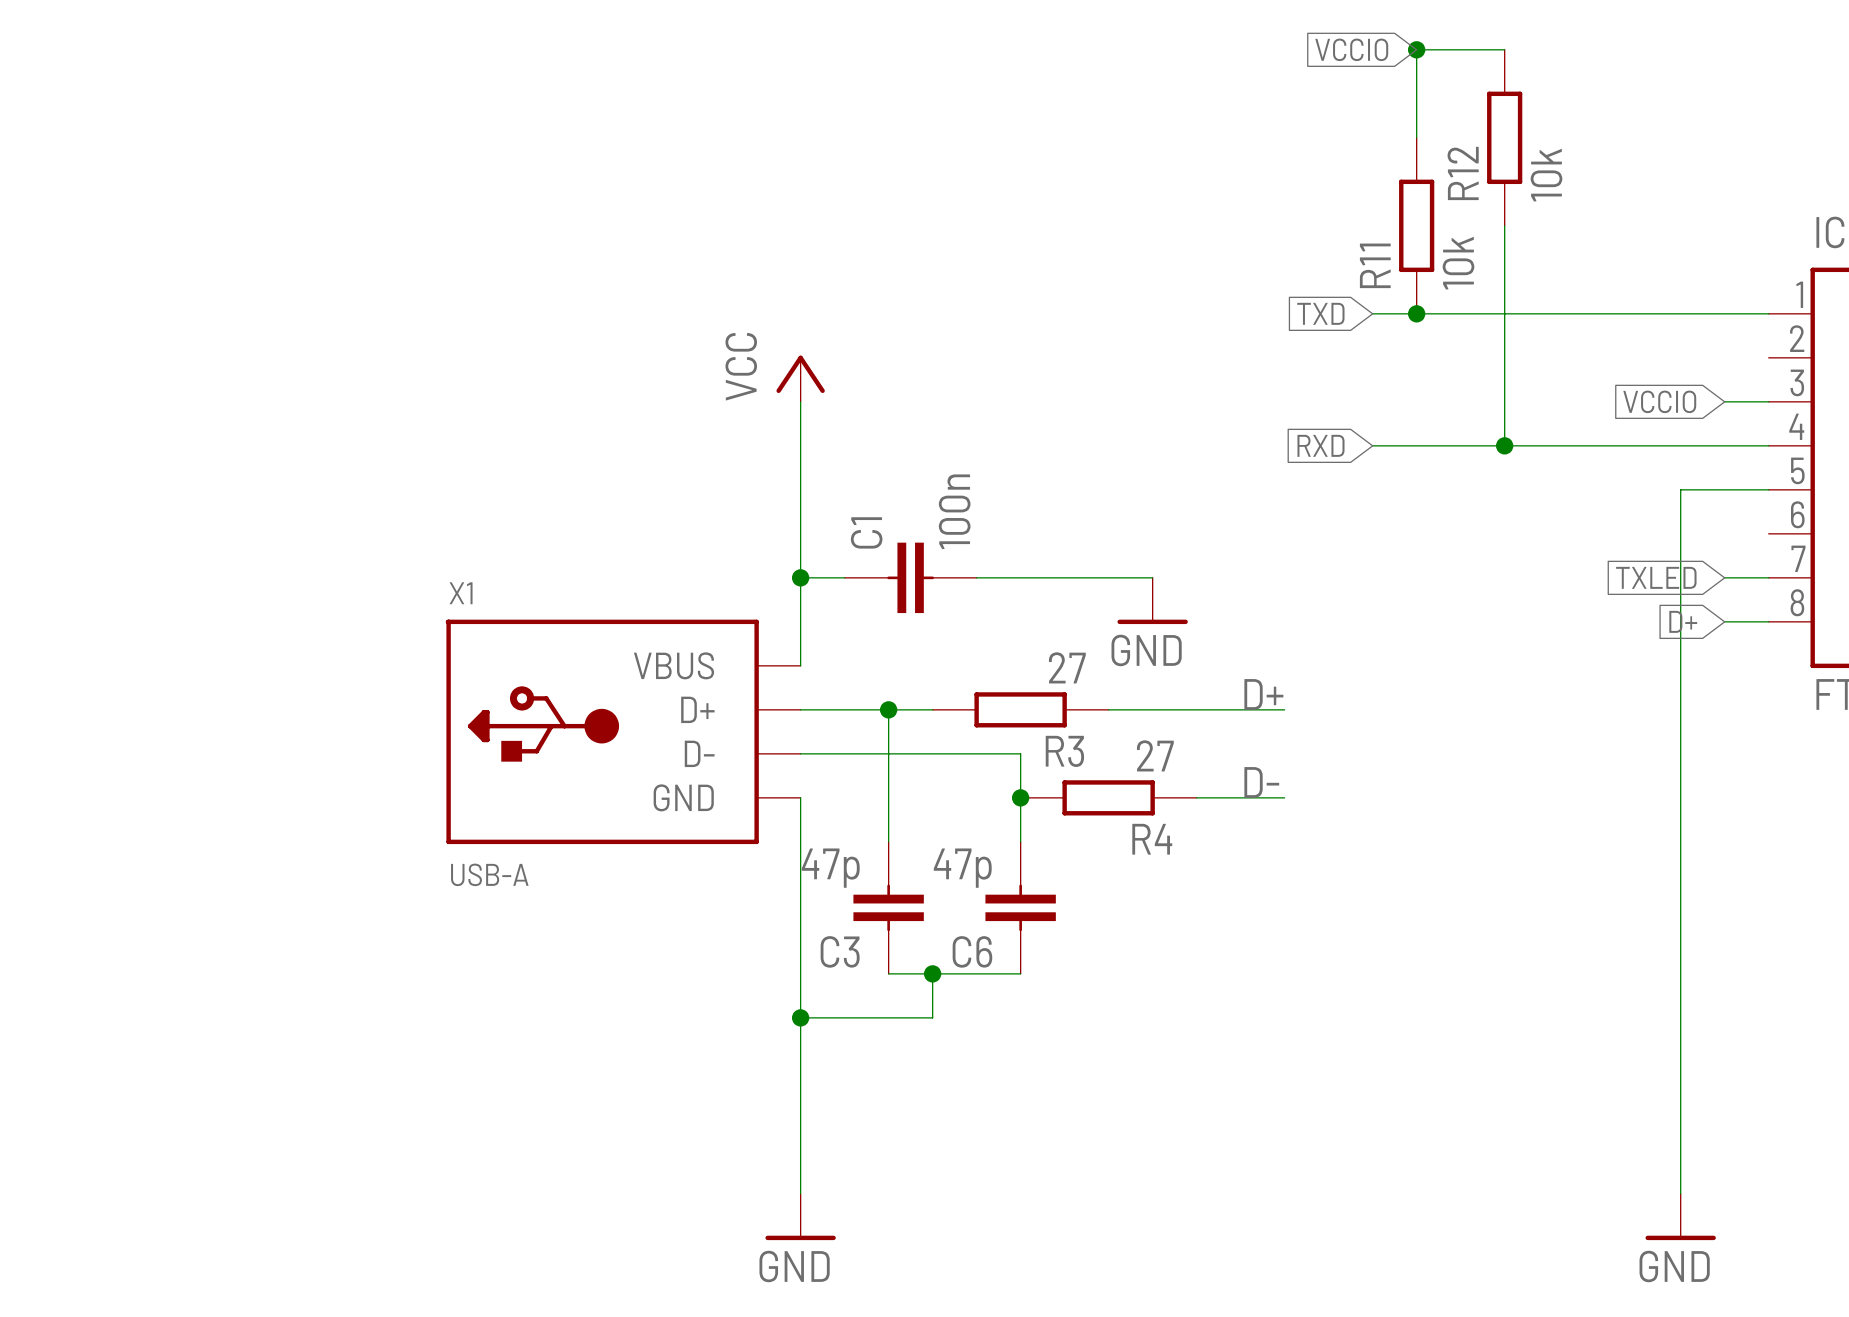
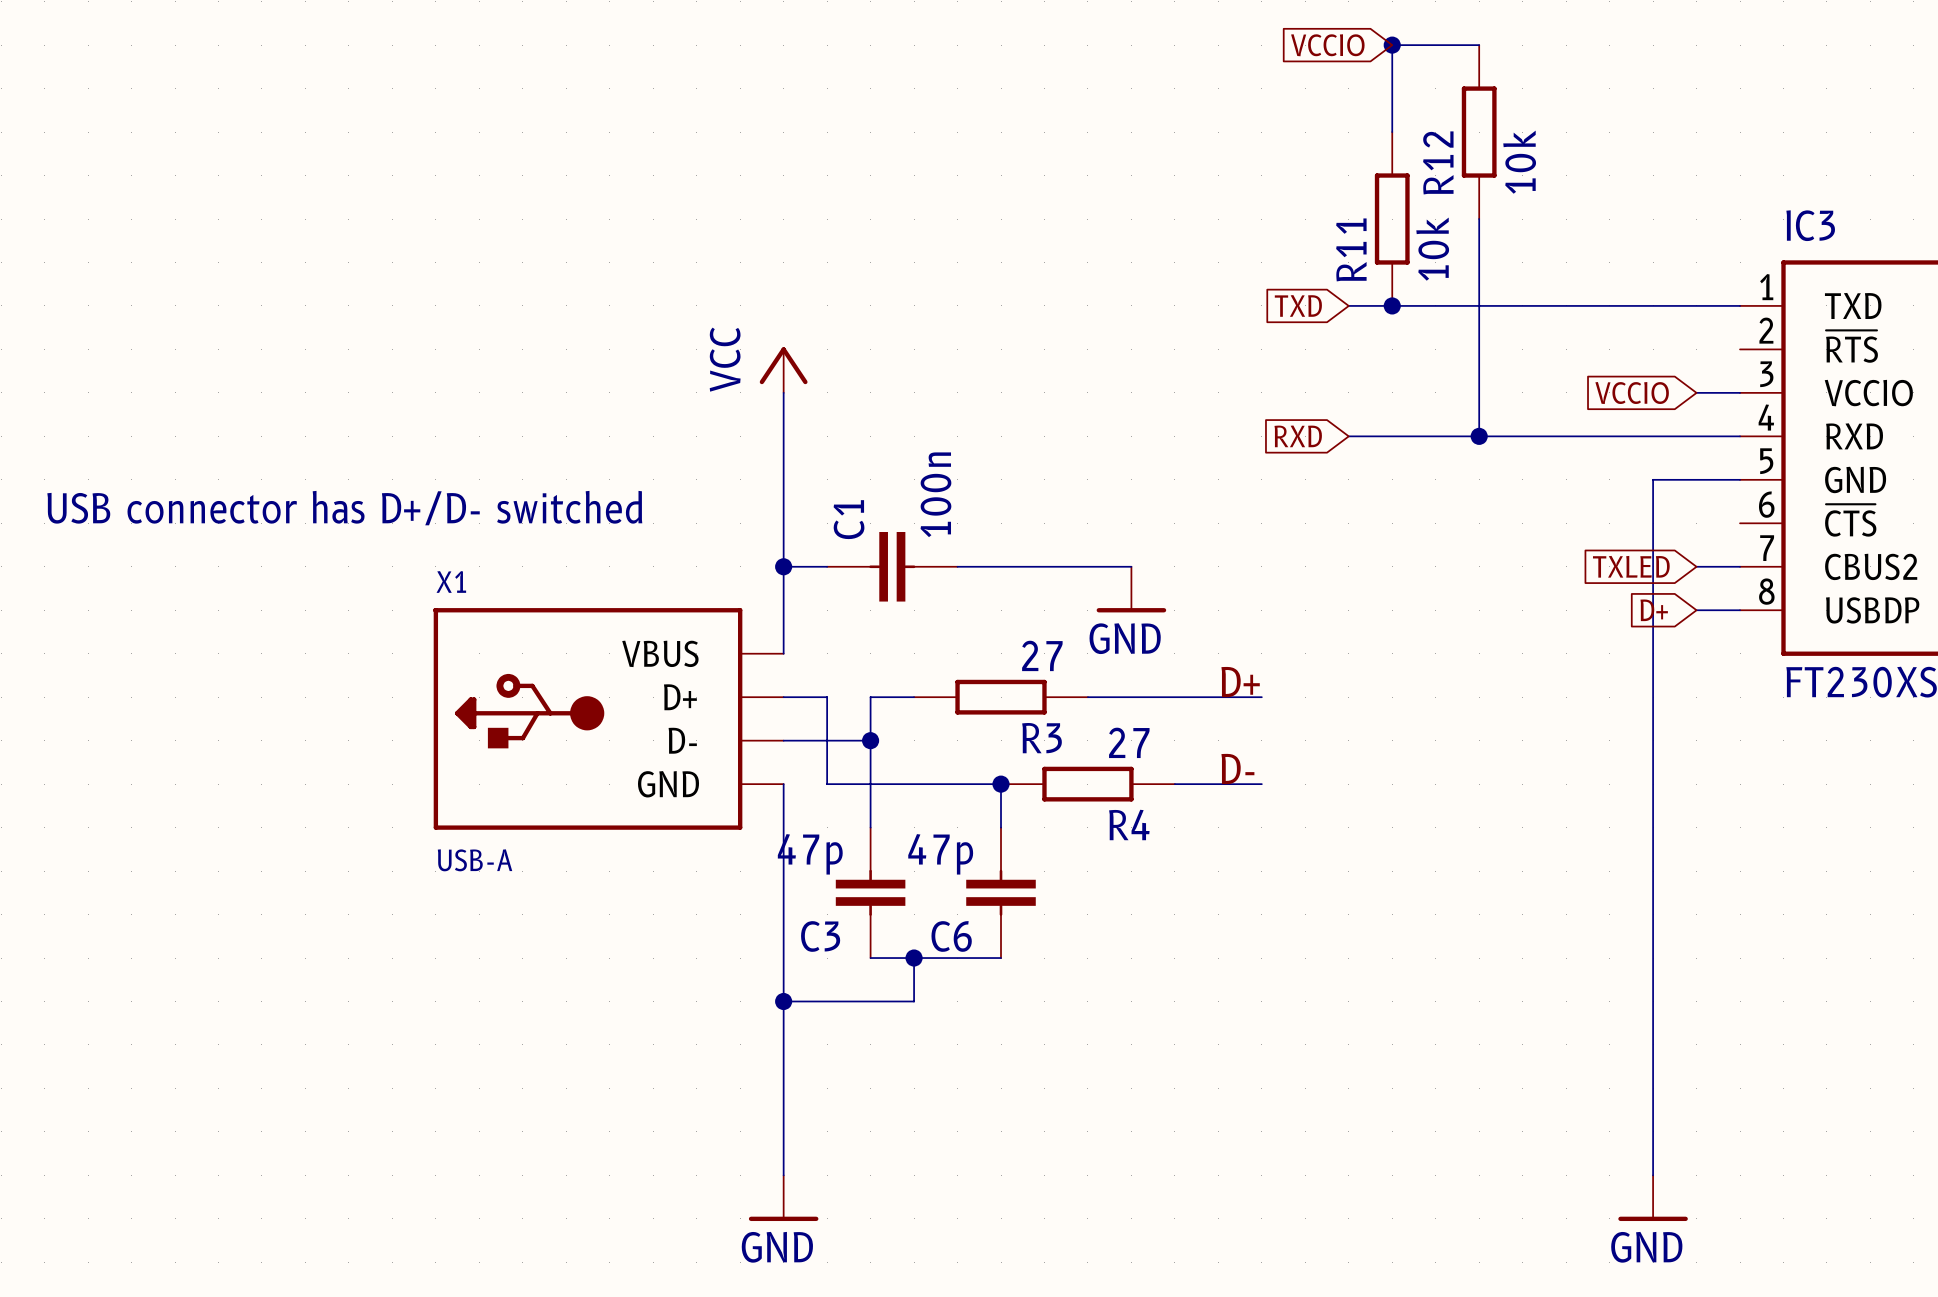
text: none -> USB connector has D+/D- switched (344, 508)
wire: (844, 709) (888, 709) -> none
junction position: (888, 709) -> (870, 740)
wire: (888, 753) (1020, 753) (1020, 797) -> (827, 697) (827, 784) (1001, 784)

